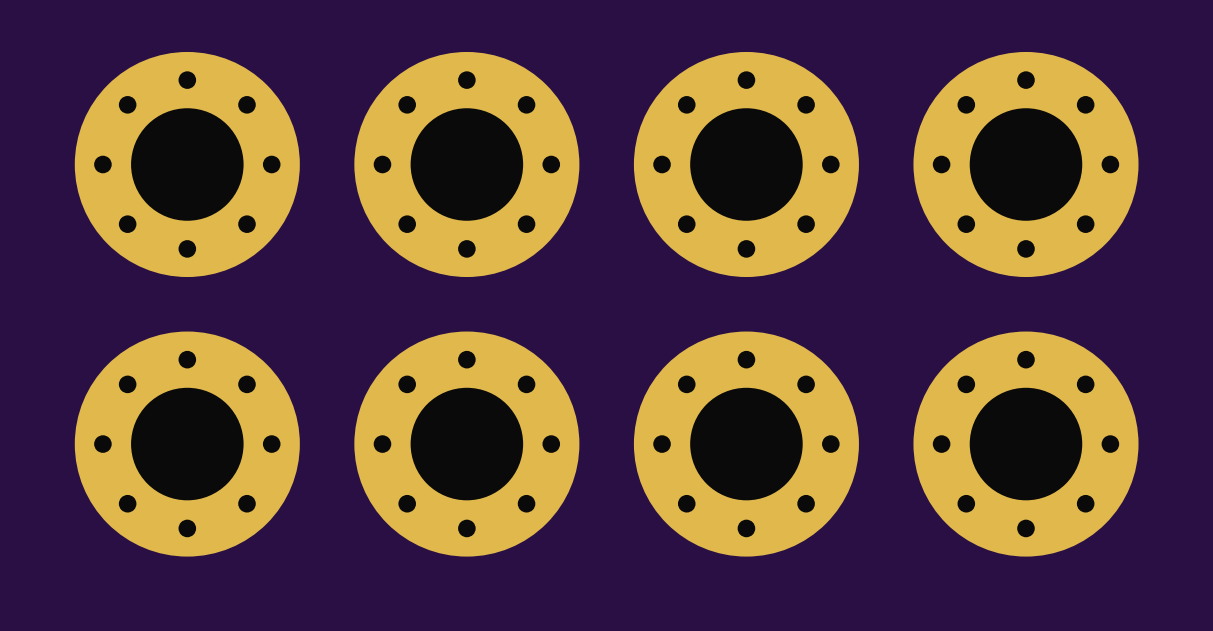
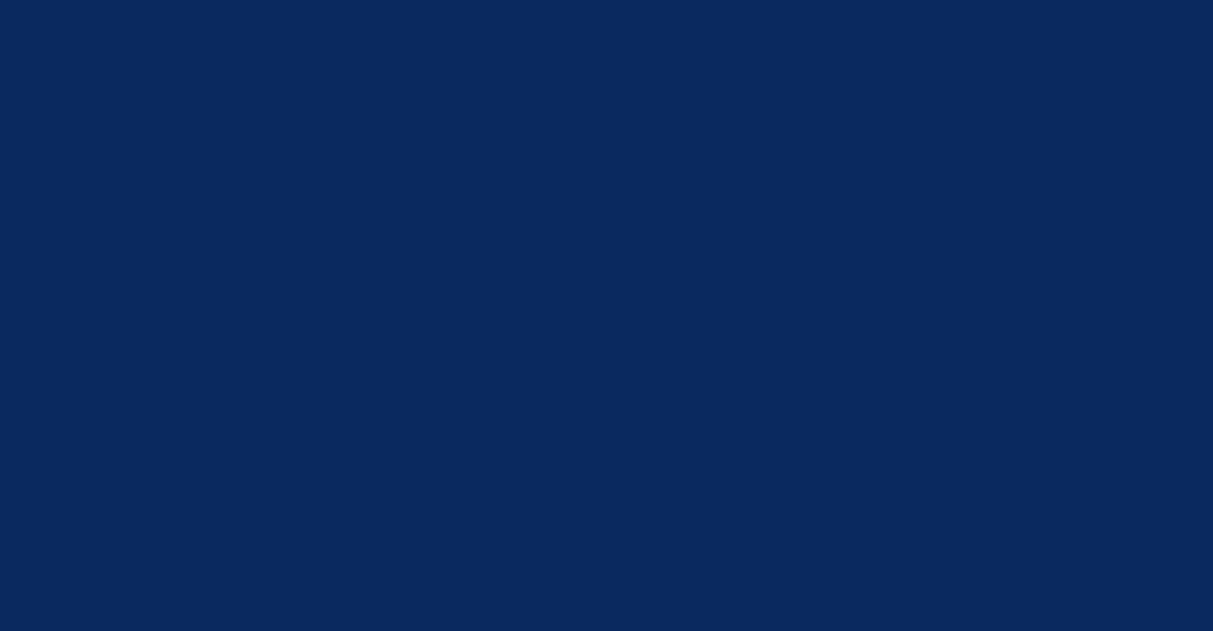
part: (187, 164) -> none
part: (466, 164) -> none
part: (746, 164) -> none
part: (1025, 164) -> none
part: (187, 444) -> none
part: (466, 444) -> none
part: (746, 444) -> none
part: (1025, 444) -> none

